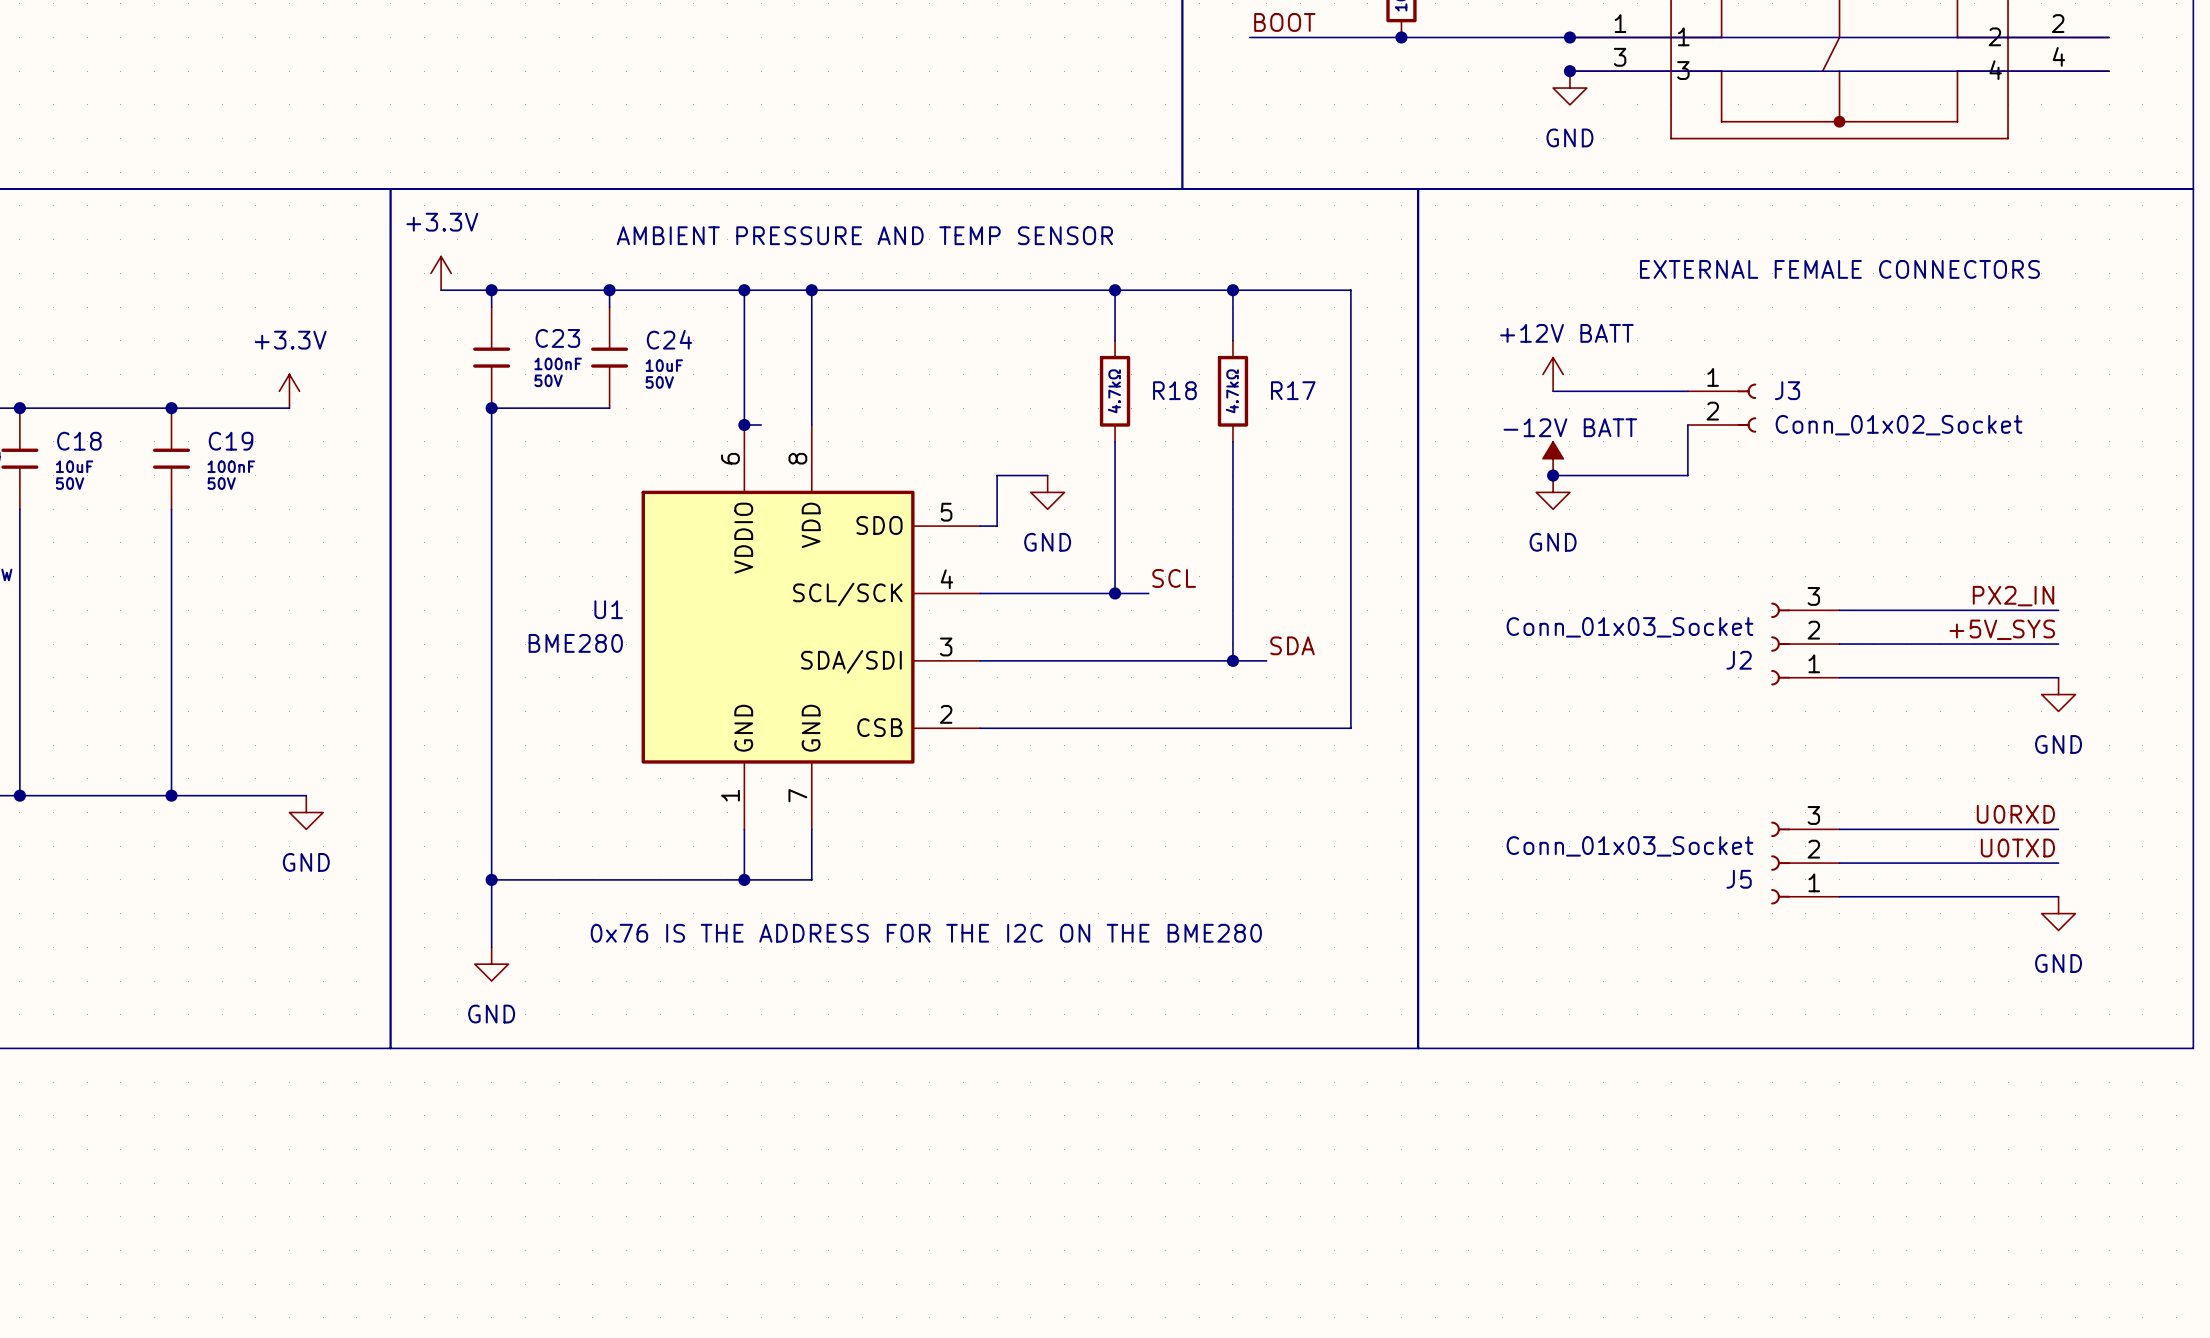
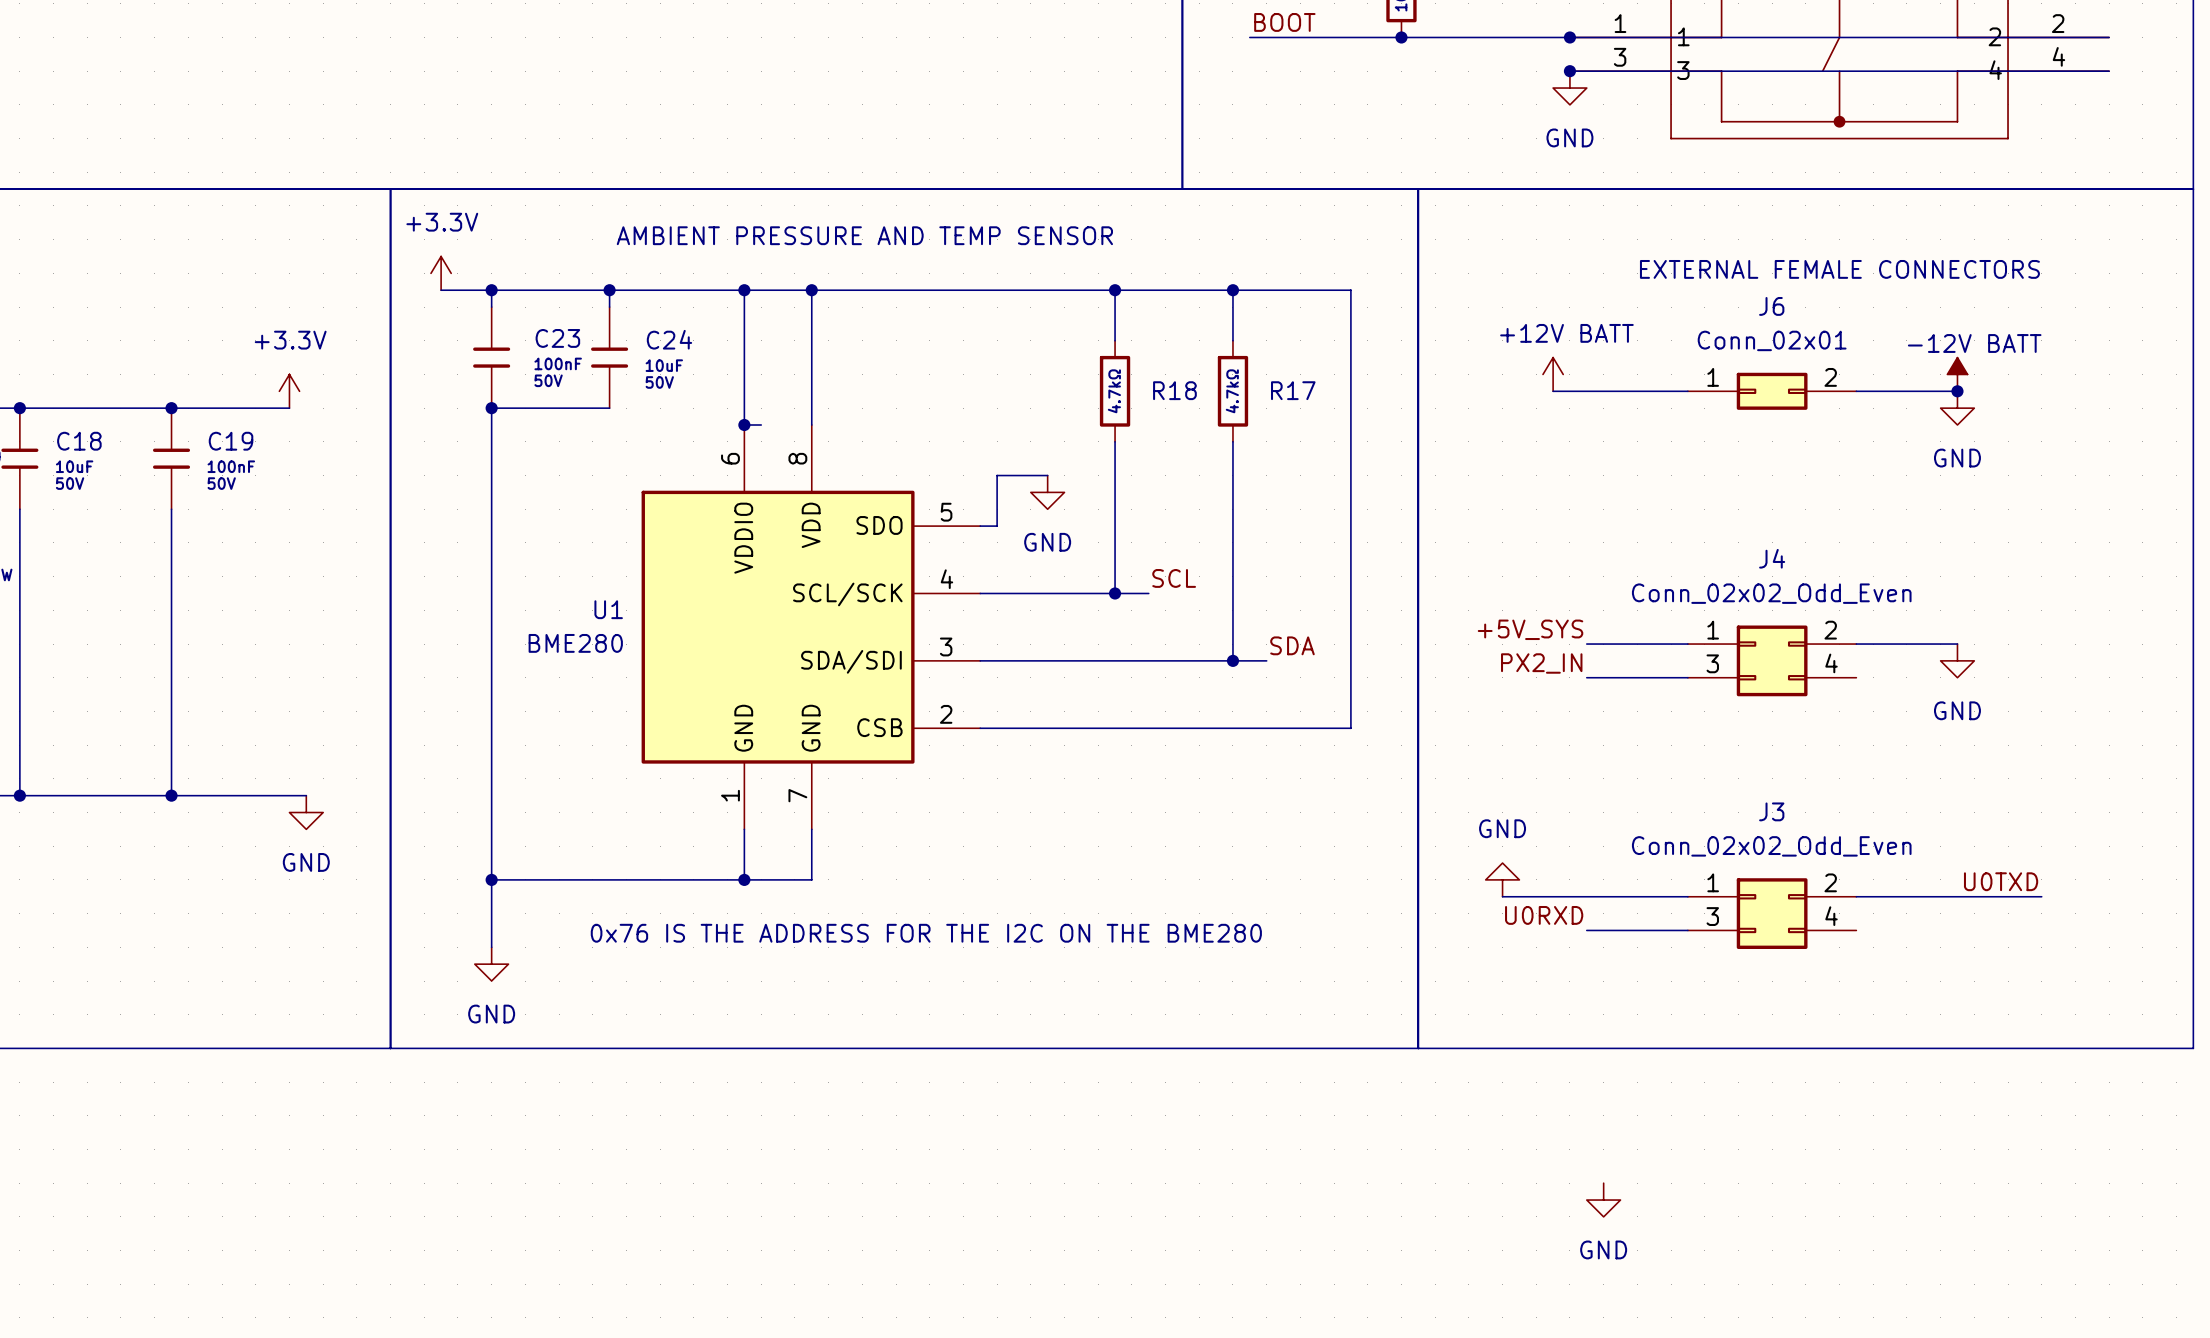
power symbol: none -> -12V BATT (1957, 374)
J3 symbol: [1687, 383, 1757, 433] -> [1687, 878, 1857, 949]
J3 name position: J3 (1787, 390) -> J3 (1771, 811)
J6: none -> Conn_02x01 (1772, 391)
junction: none -> (1957, 391)
power symbol: none -> GND (1957, 408)
wire: (1687, 425) (1687, 475) (1553, 475) -> none
J3 value: Conn_01x02_Socket (1899, 425) -> Conn_02x02_Odd_Even (1771, 846)
power symbol: -12V BATT (1553, 458) -> none
junction: (1553, 475) -> none
power symbol: GND (1553, 492) -> none
label: PX2_IN (2013, 596) -> none
wire: (1839, 610) (2058, 610) -> none
label: none -> +5V_SYS (1530, 629)
label: +5V_SYS (2002, 629) -> none
wire: none -> (1586, 644) (1687, 644)
J2: Conn_01x03_Socket (1805, 644) -> none
wire: (1957, 644) (2058, 644) -> (1856, 391) (1957, 391)
J4: none -> Conn_02x02_Odd_Even (1772, 660)
label: none -> PX2_IN (1541, 663)
wire: none -> (1586, 677) (1687, 677)
wire: (1839, 677) (2058, 677) -> none
power symbol position: GND (2058, 694) -> GND (1957, 660)
label: U0RXD (2015, 814) -> none
wire: (1839, 829) (2058, 829) -> none
label position: U0TXD (2017, 848) -> U0TXD (2001, 881)
J5: Conn_01x03_Socket (1805, 863) -> none
wire: (1839, 863) (2058, 863) -> none
power symbol: none -> GND (1502, 879)
wire: none -> (1502, 896) (1687, 896)
wire: (2041, 896) (2058, 896) -> none
power symbol: GND (2058, 913) -> none
label: none -> U0RXD (1544, 915)
wire: none -> (1586, 930) (1687, 930)
power symbol: none -> GND (1603, 1200)

